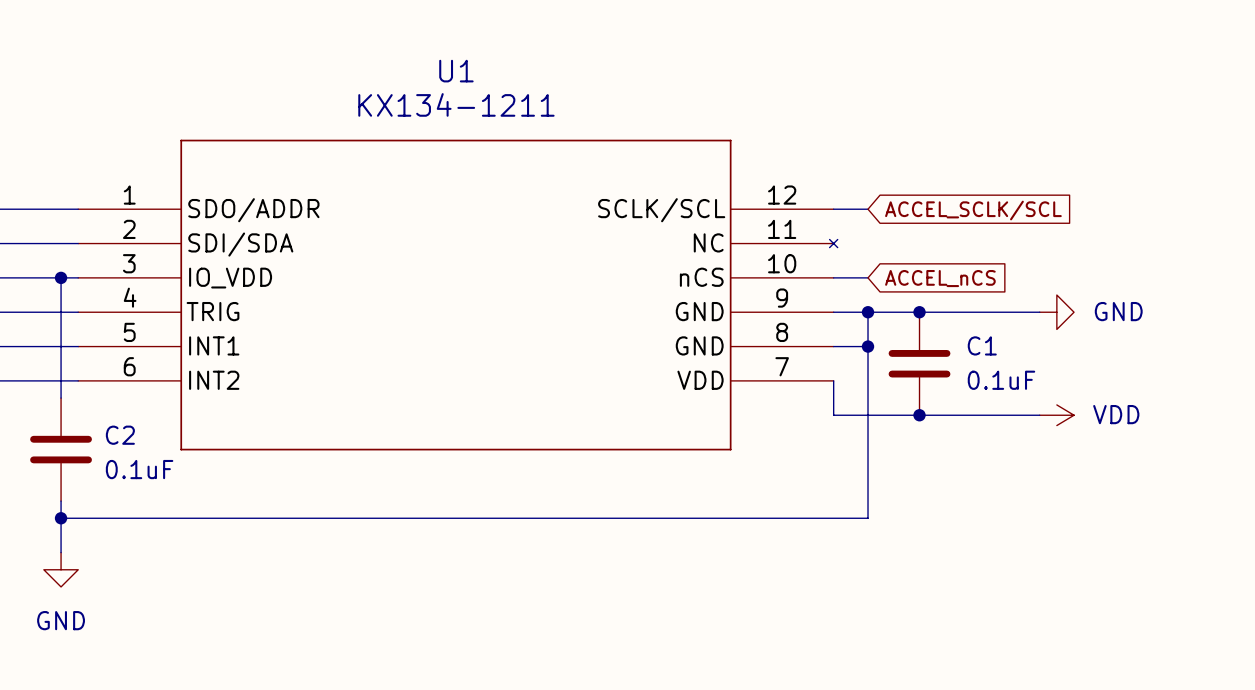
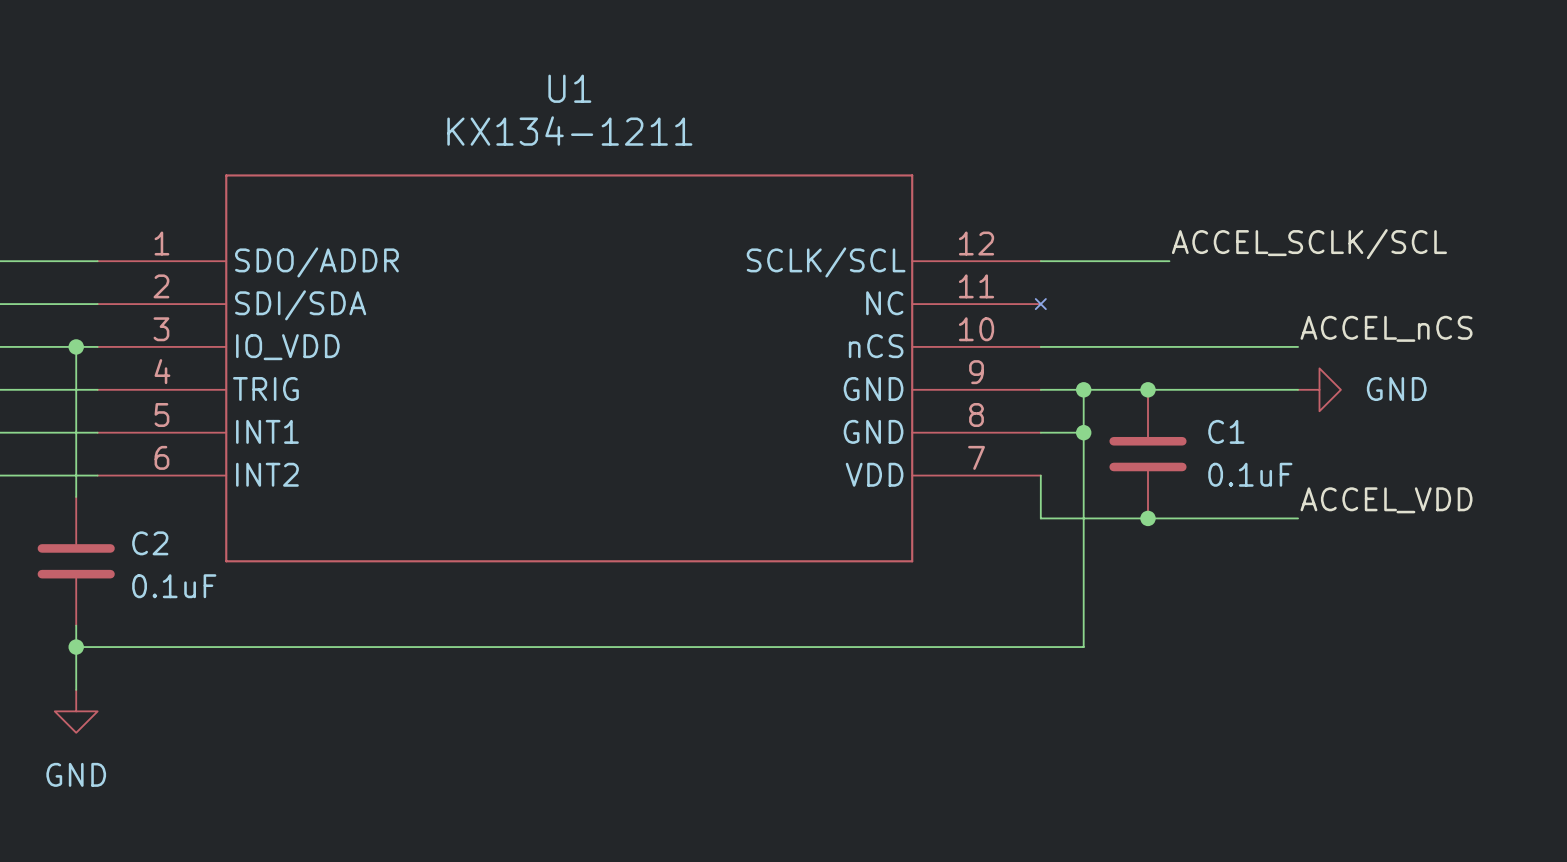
label: none -> ACCEL_SCLK/SCL (1309, 244)
wire: none -> (1083, 261) (1169, 261)
global label: ACCEL_SCLK/SCL (973, 210) -> none
label: none -> ACCEL_nCS (1386, 328)
wire: none -> (1083, 346) (1298, 346)
global label: ACCEL_nCS (940, 278) -> none
label: none -> ACCEL_VDD (1386, 500)
power symbol: VDD (1056, 415) -> none

